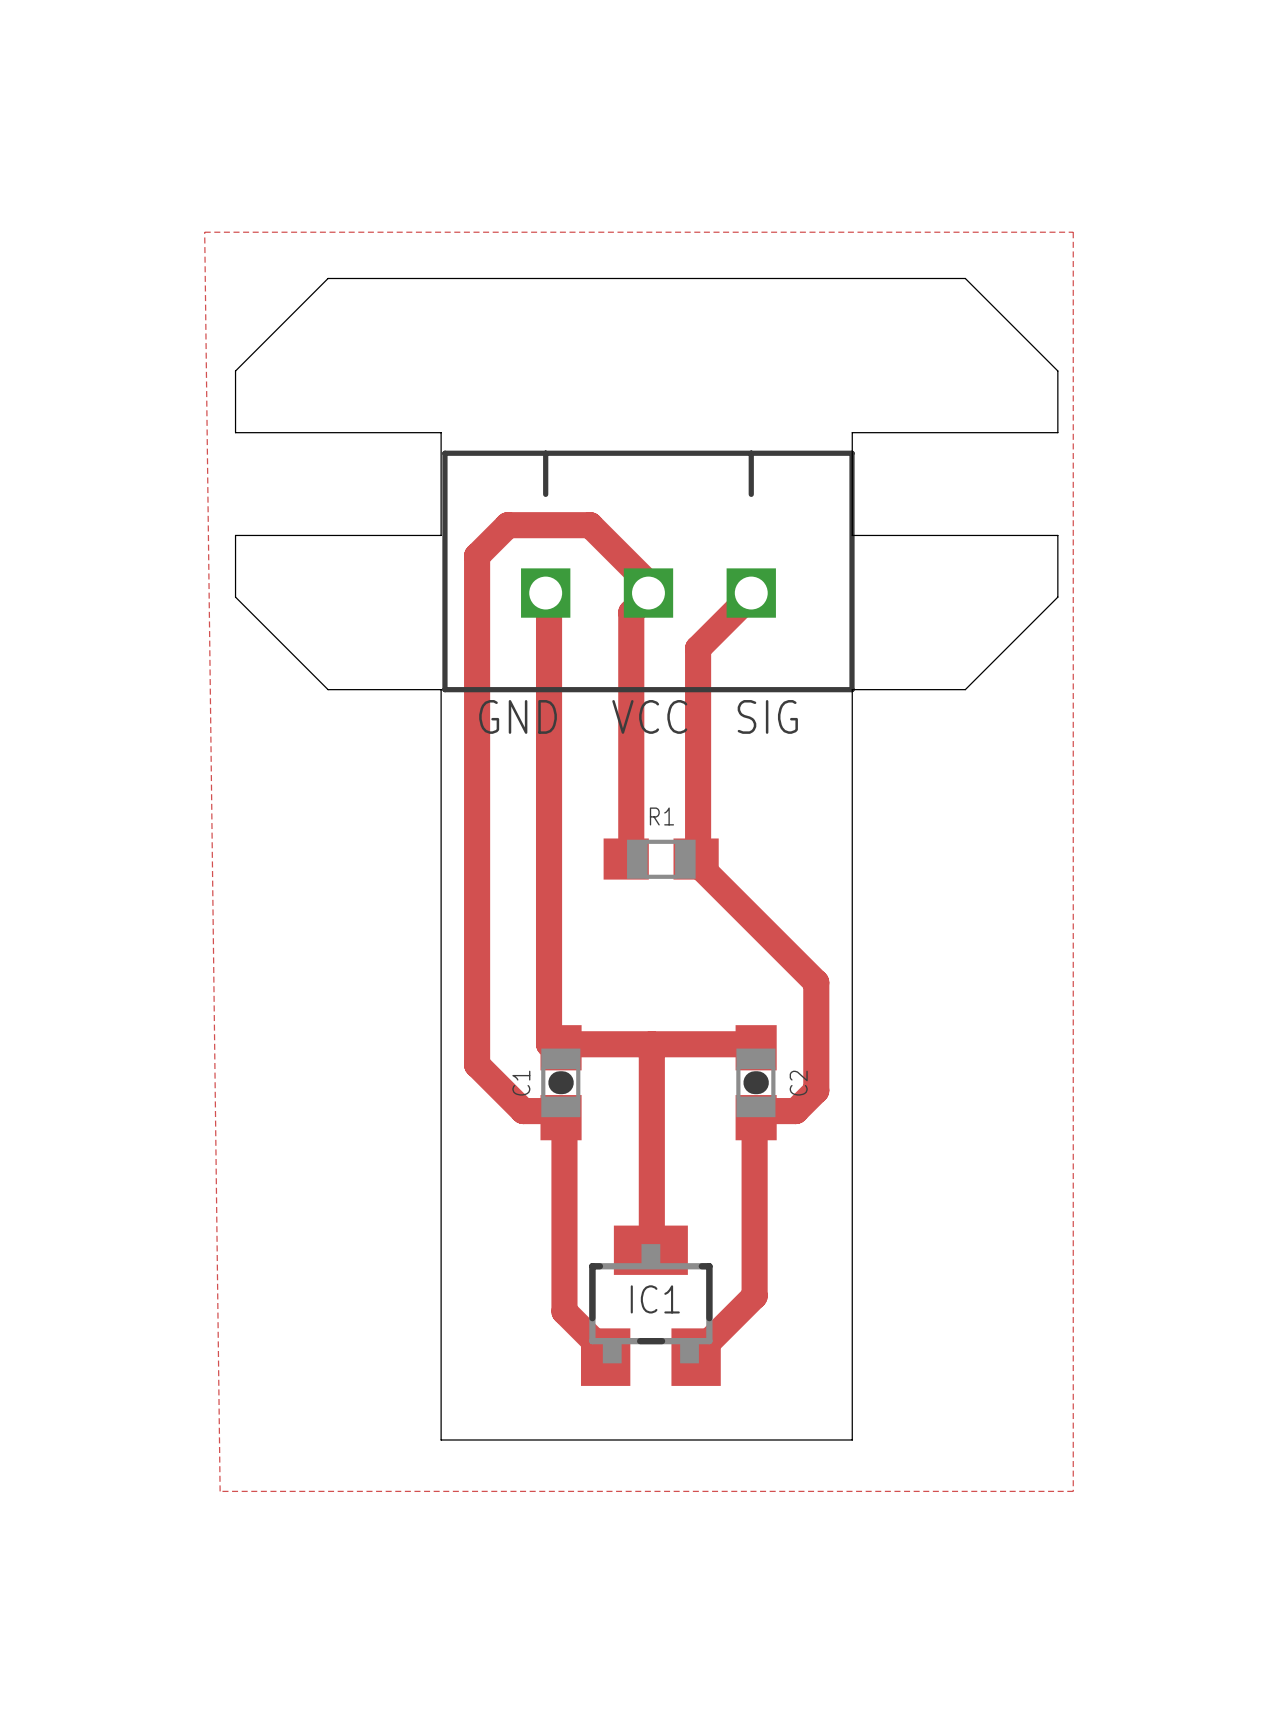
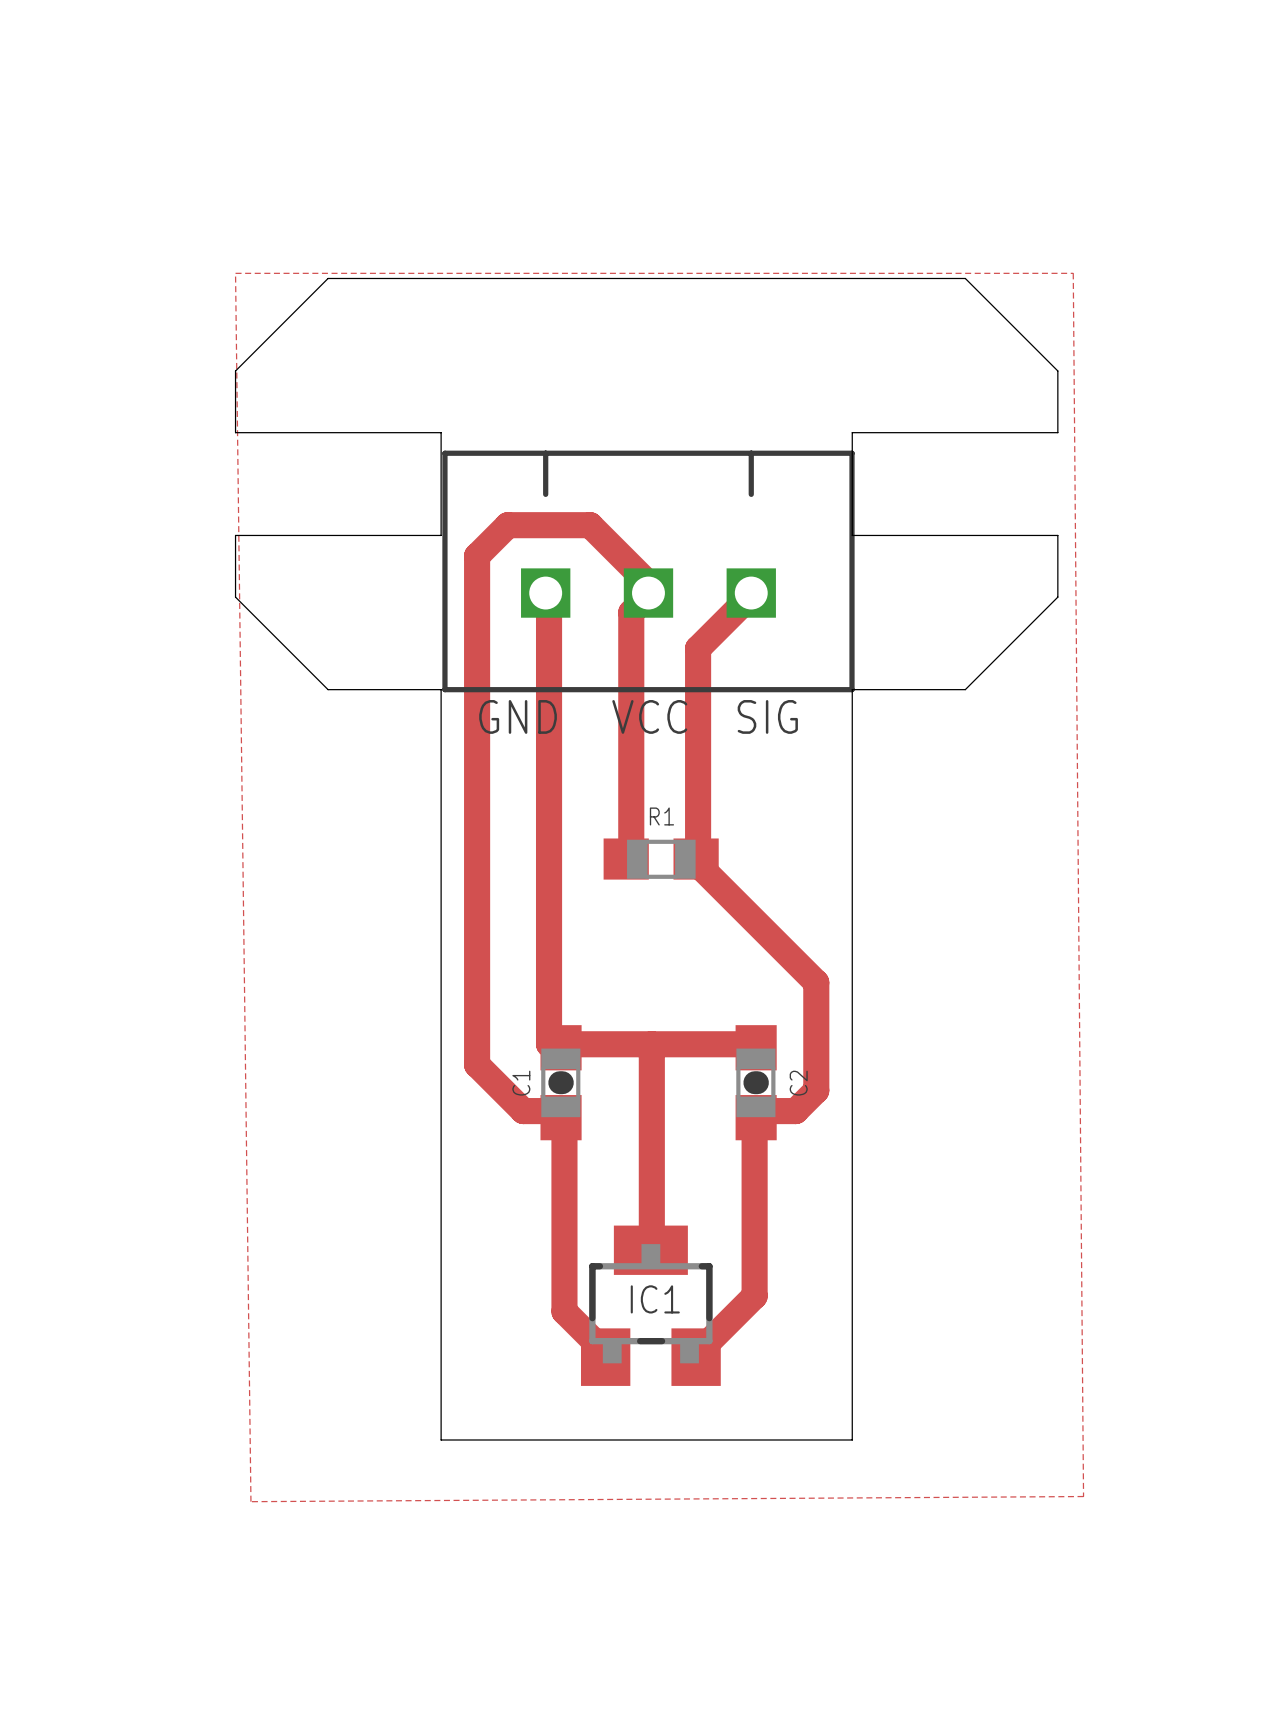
zone outline: (204, 232) (1073, 232) (1073, 1491) (220, 1491) (204, 232) -> (235, 273) (250, 1501) (1083, 1496) (1073, 273) (235, 273)

